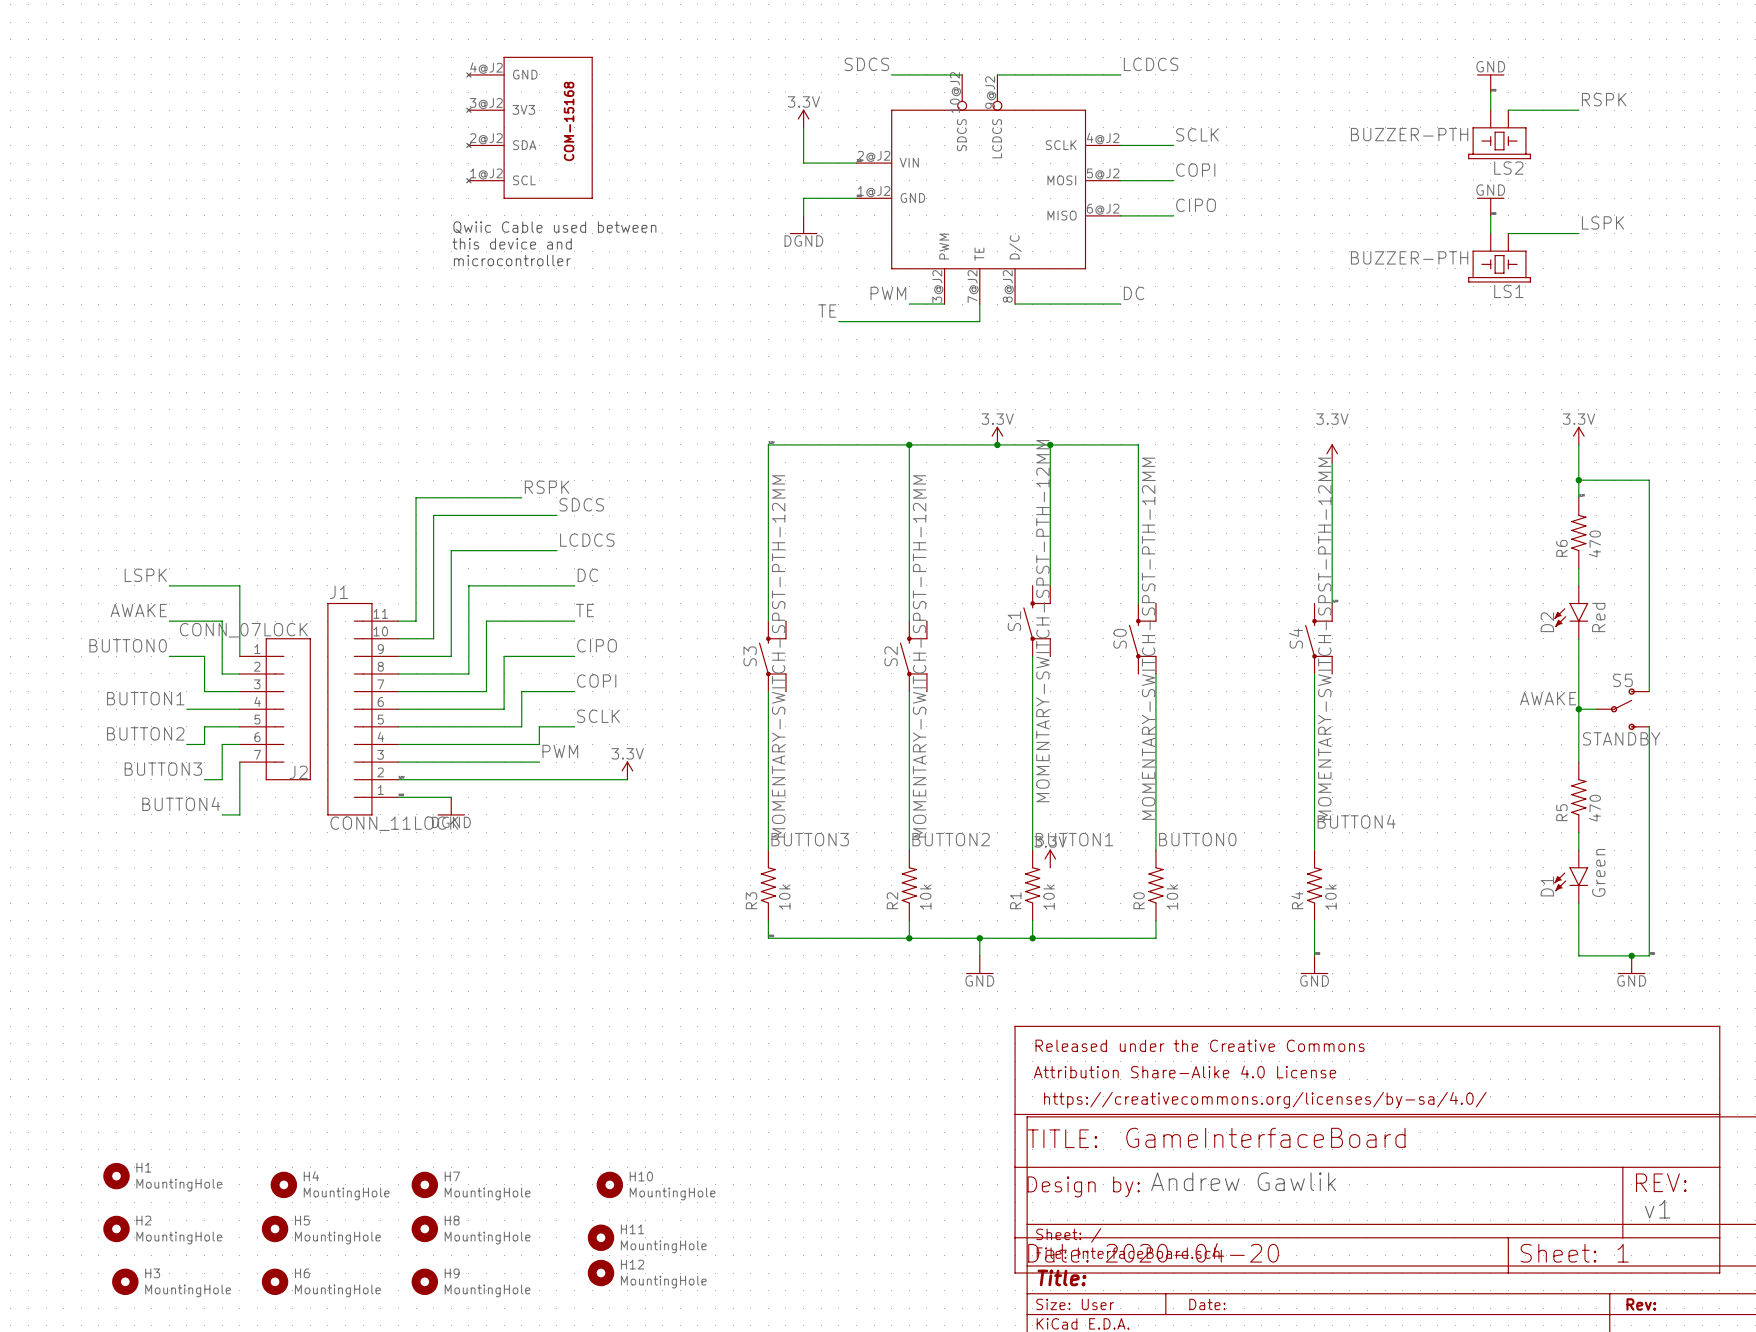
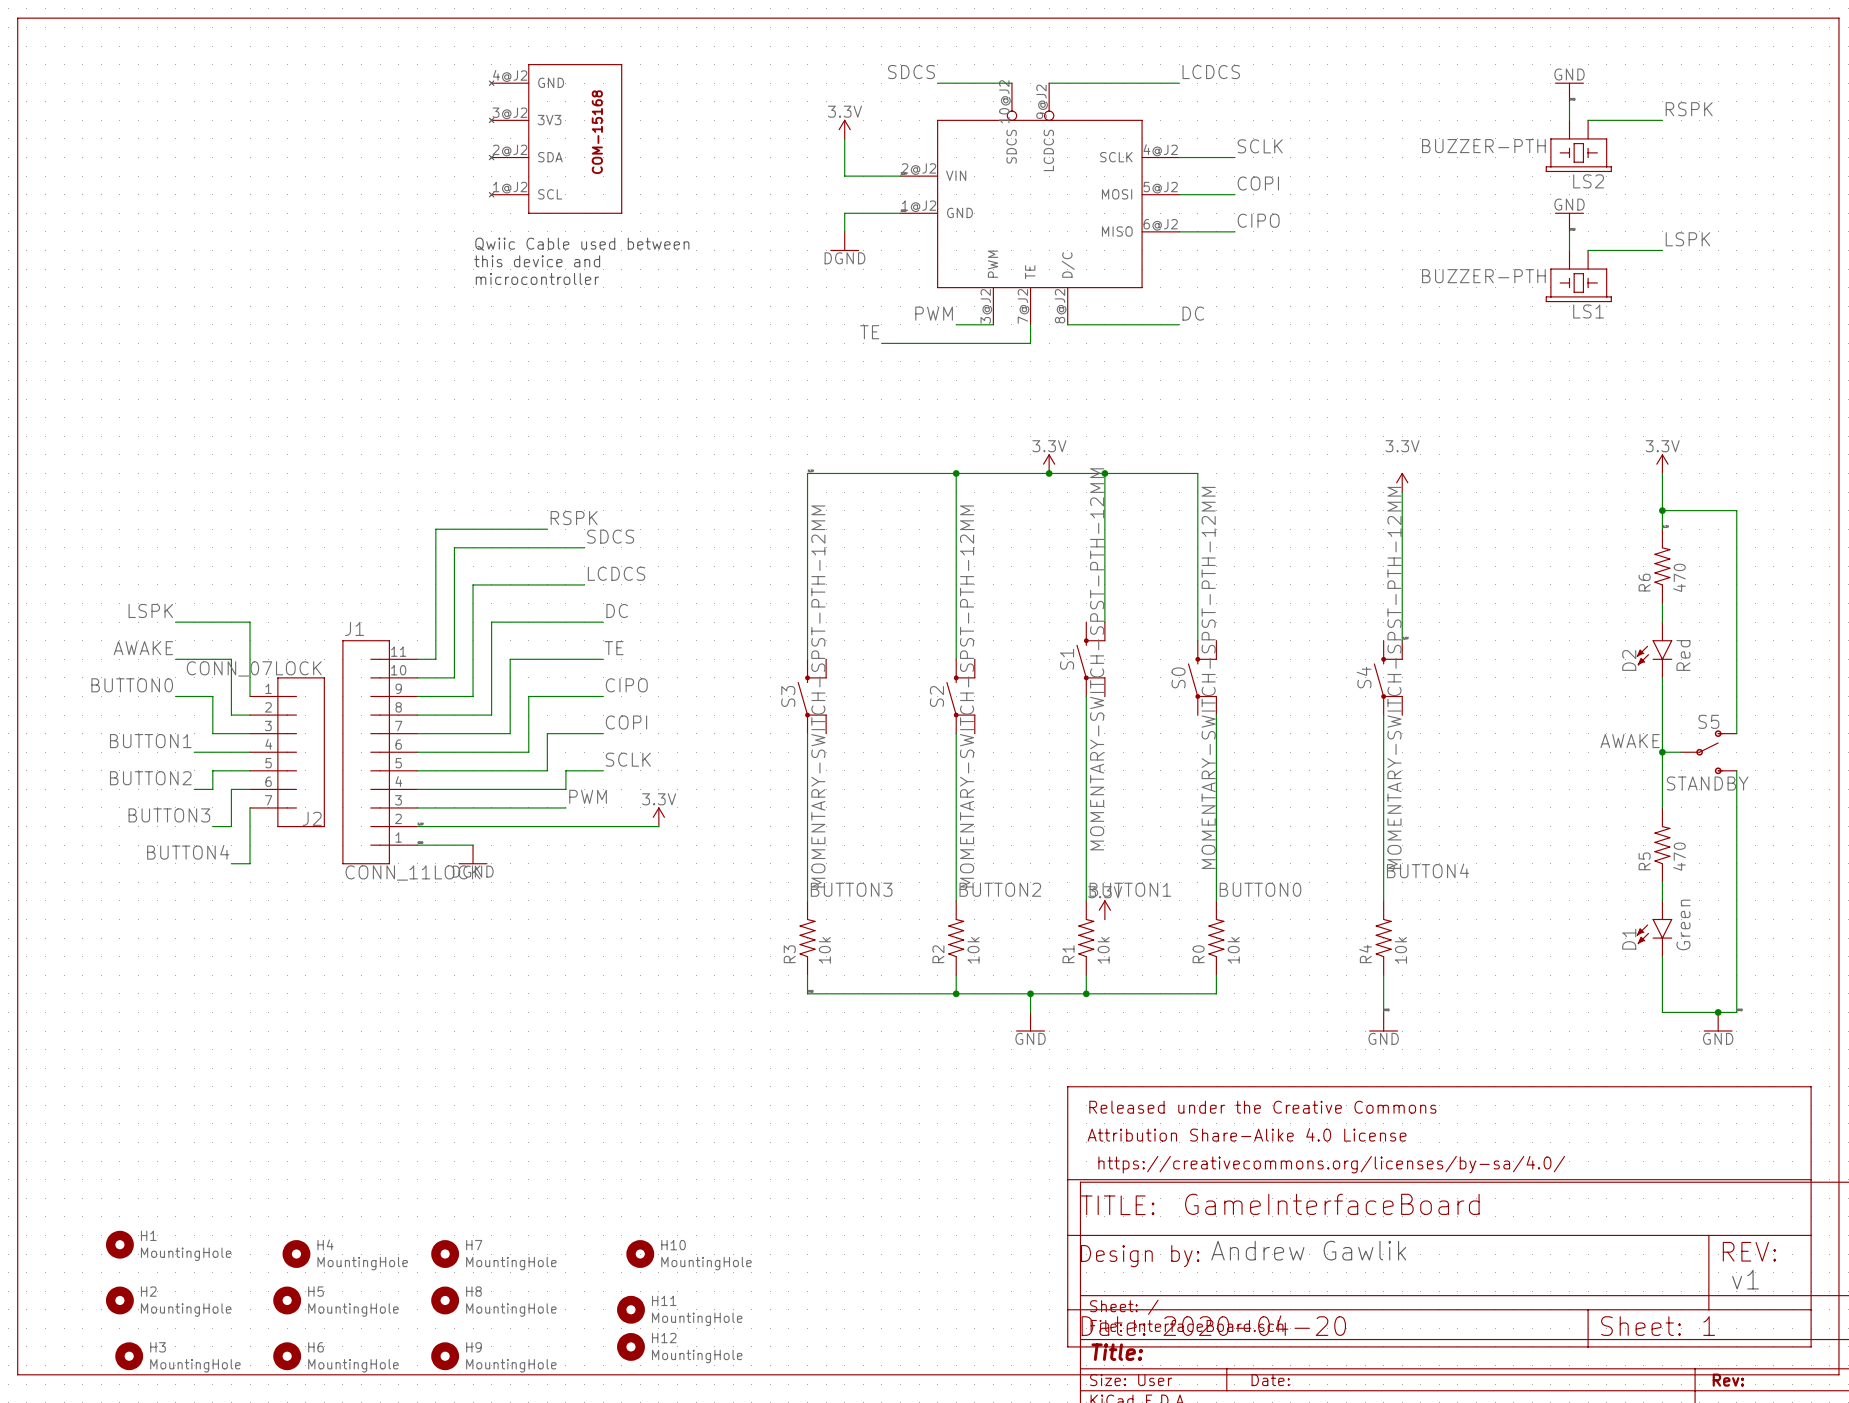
part: none -> (928, 696)

